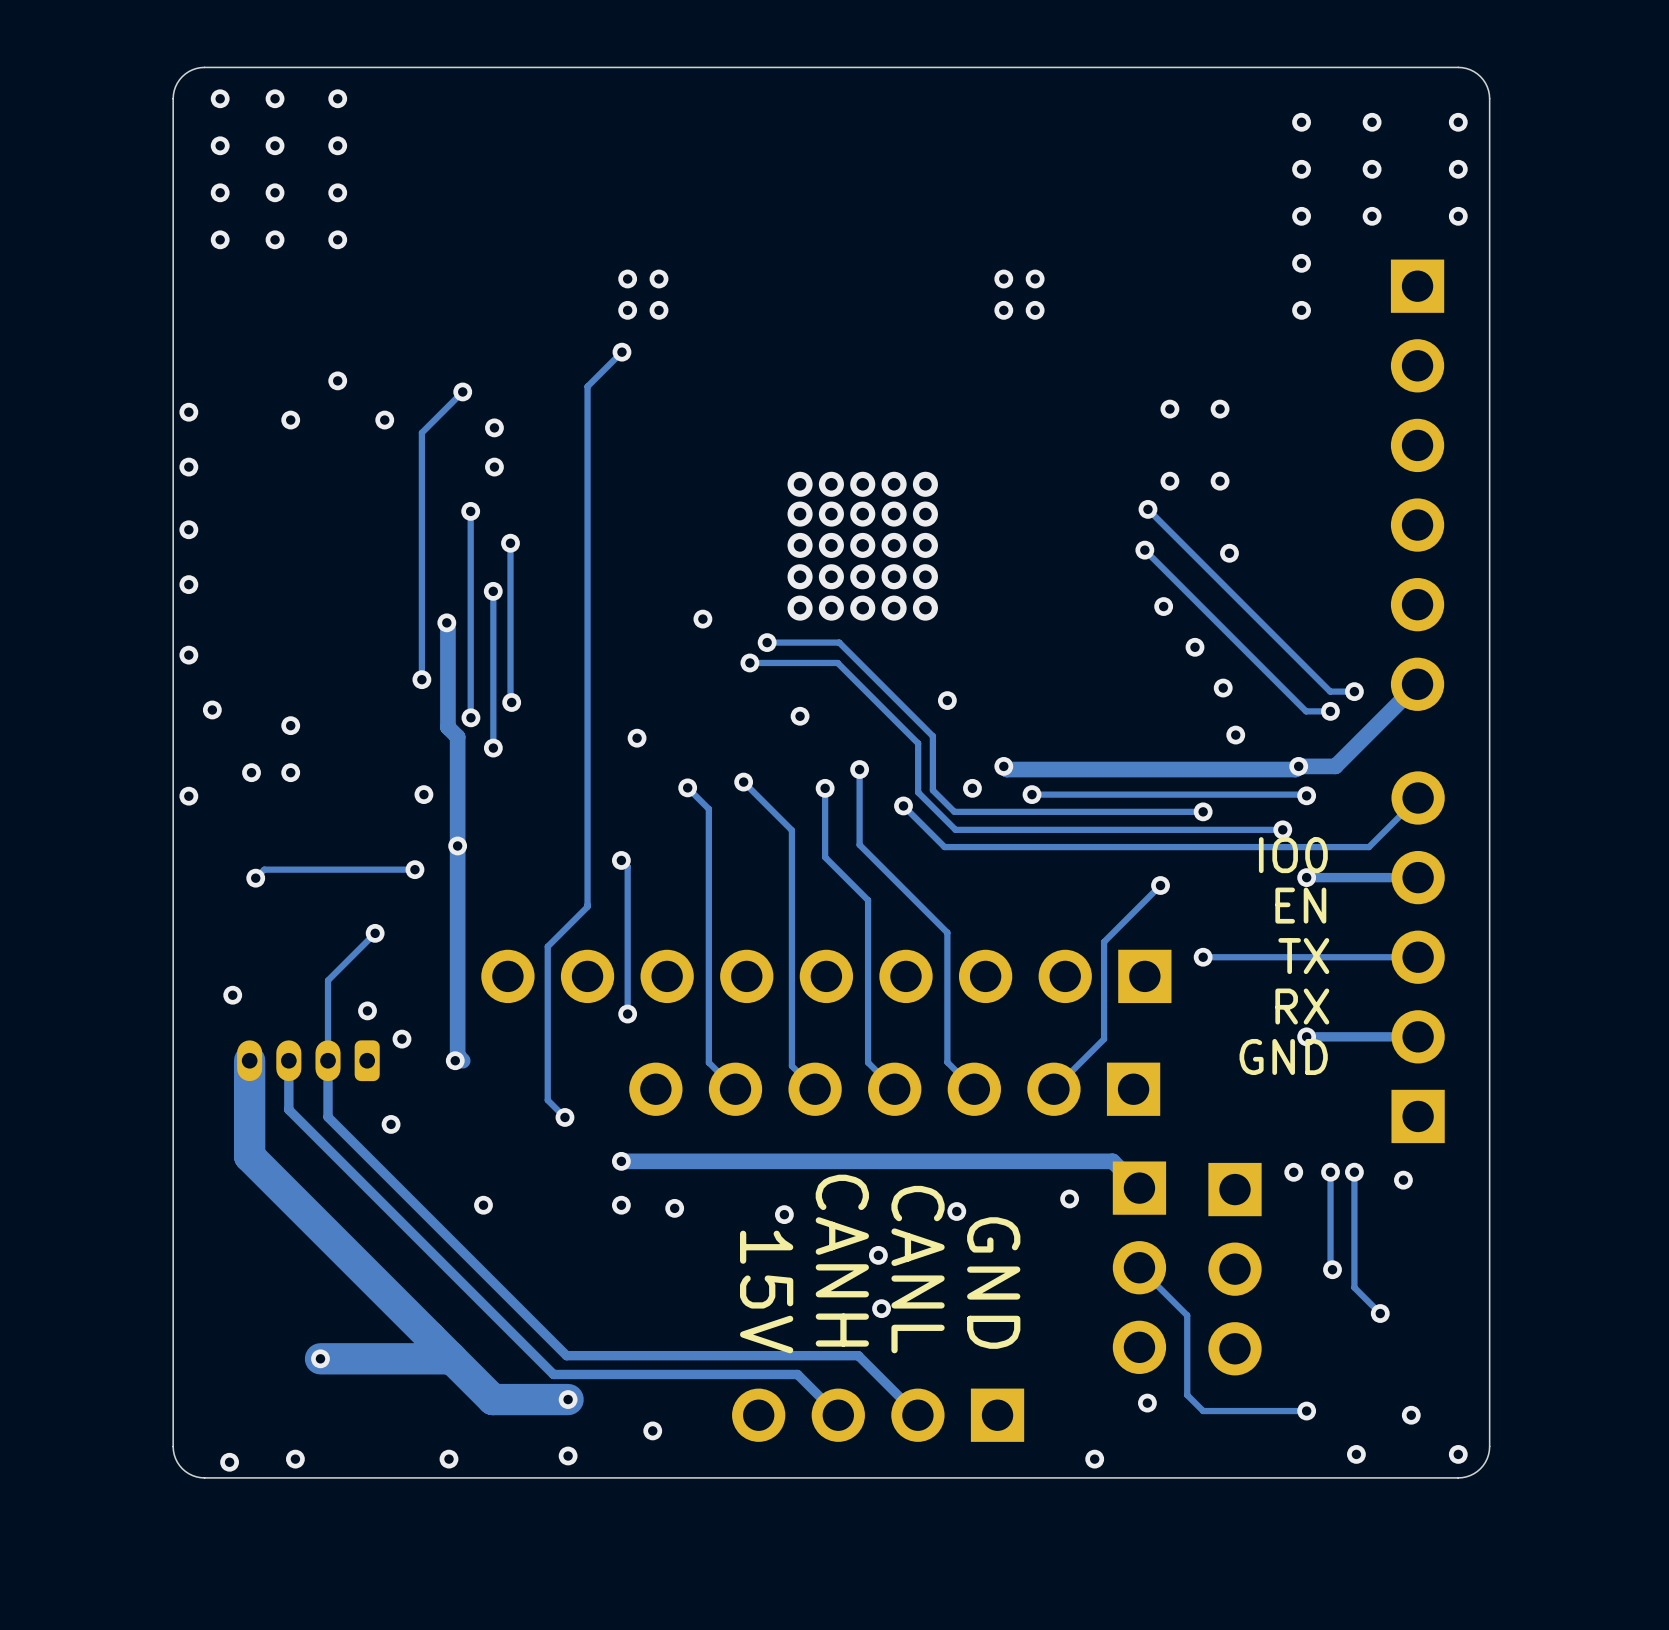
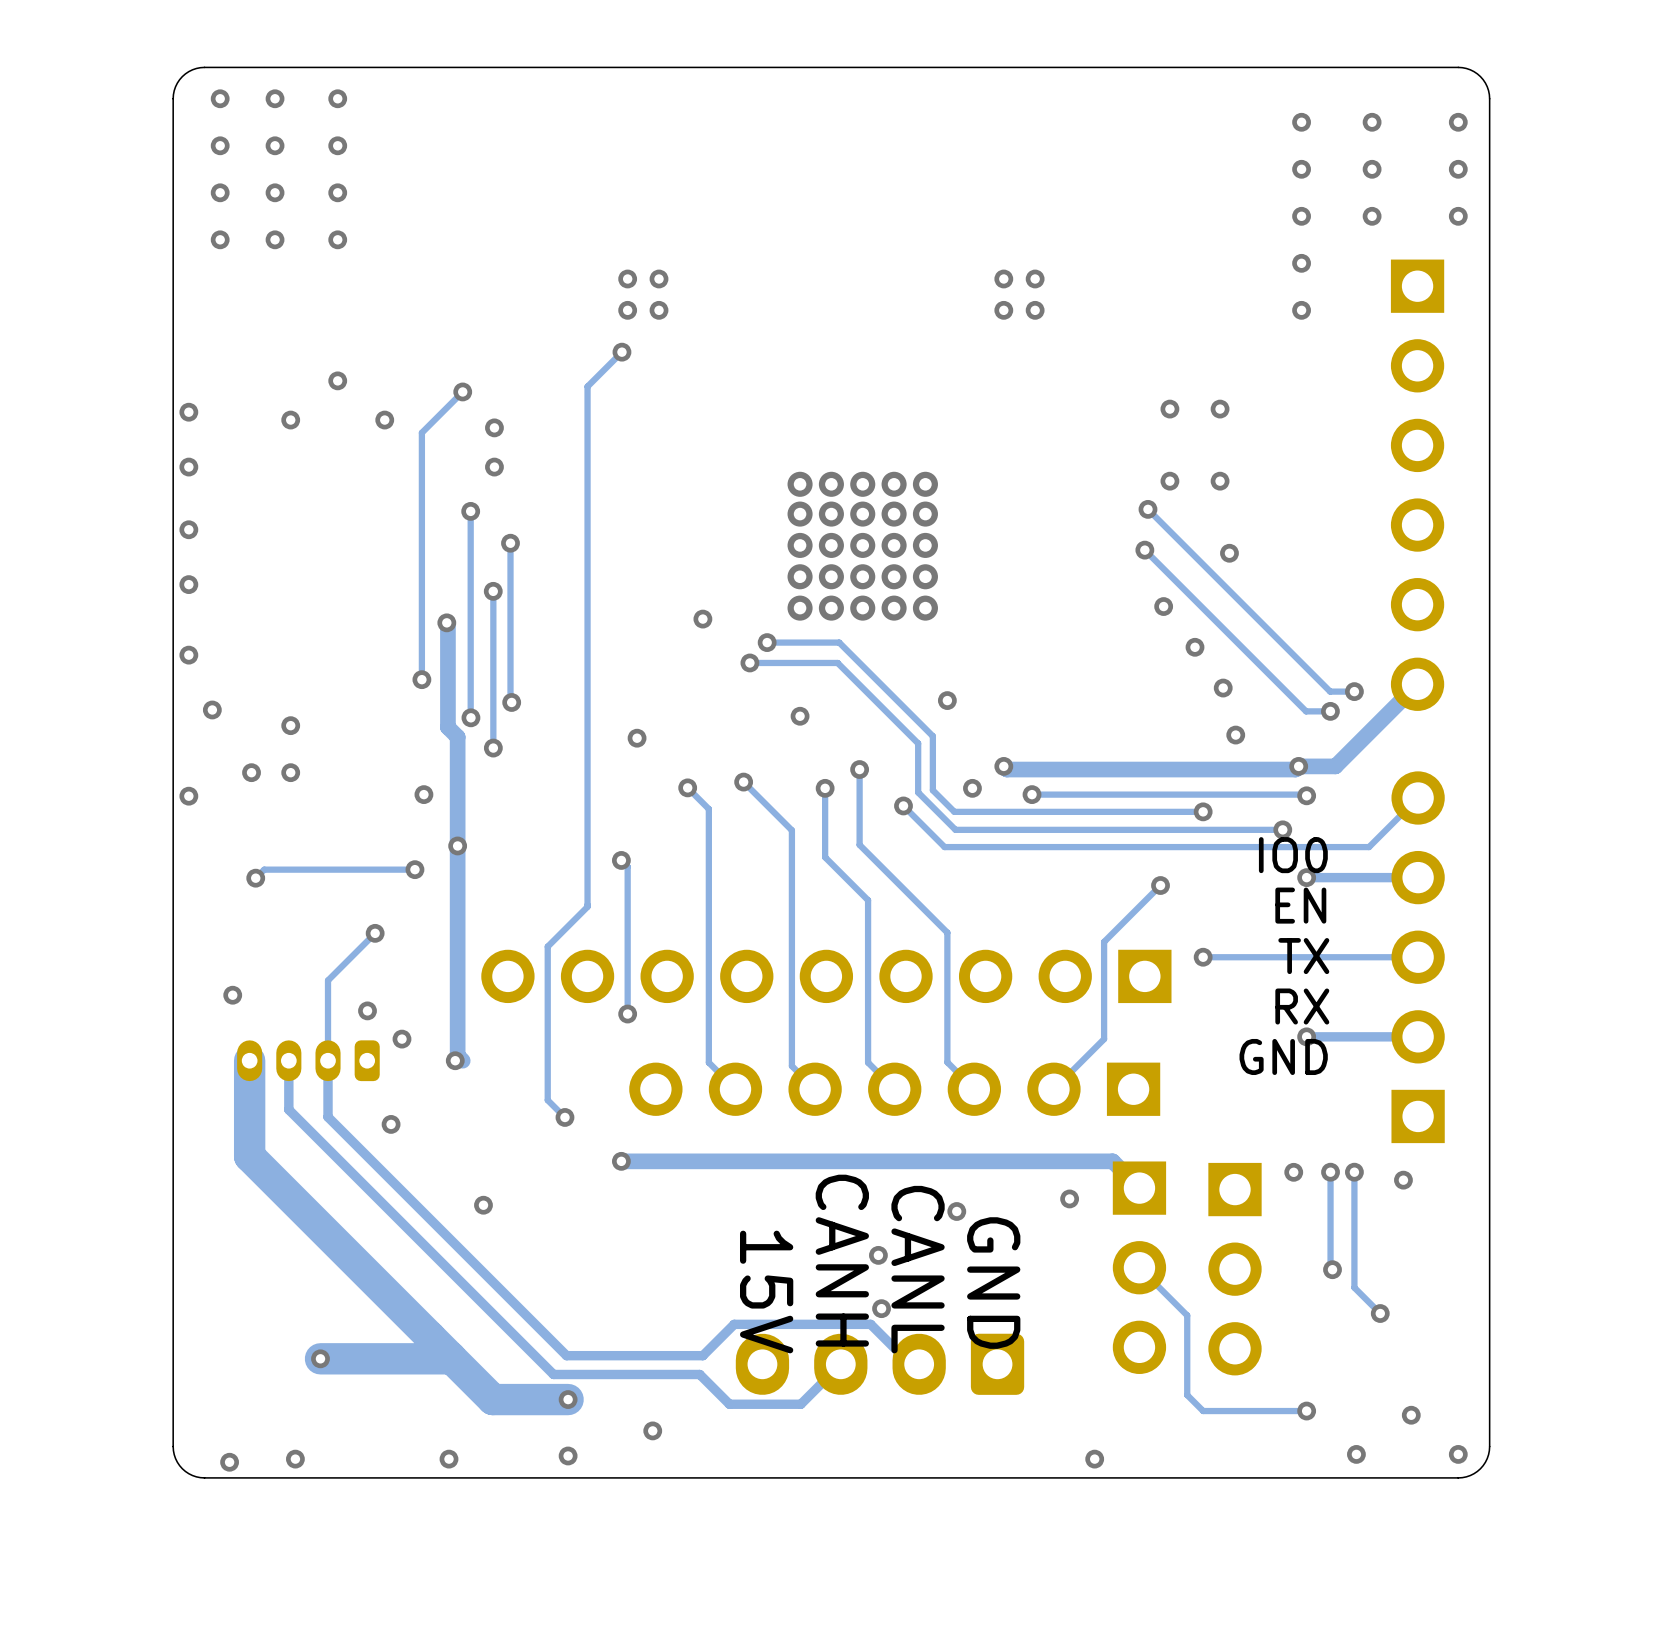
via: (621, 1205) -> none
via: (674, 1208) -> none
via: (784, 1214) -> none
track: (702, 1355) (858, 1355) (917, 1415) -> (702, 1355) (734, 1324) (870, 1324) (910, 1364) (919, 1364)
part: none -> (879, 1364)
track: (699, 1374) (797, 1374) (838, 1415) -> (699, 1374) (729, 1404) (800, 1404) (840, 1364)
via: (1147, 1403) -> none
part: (878, 1415) -> none

